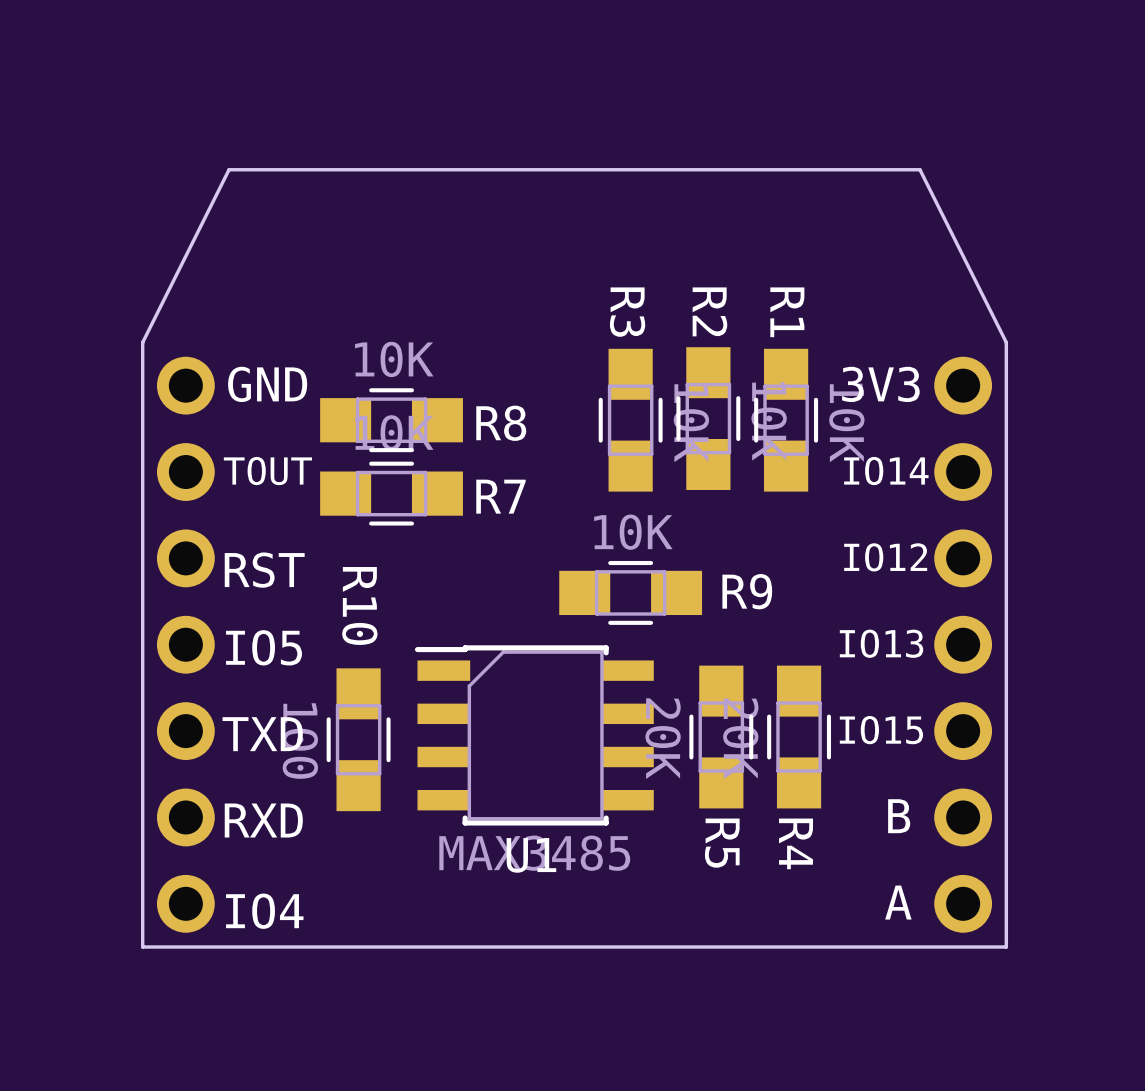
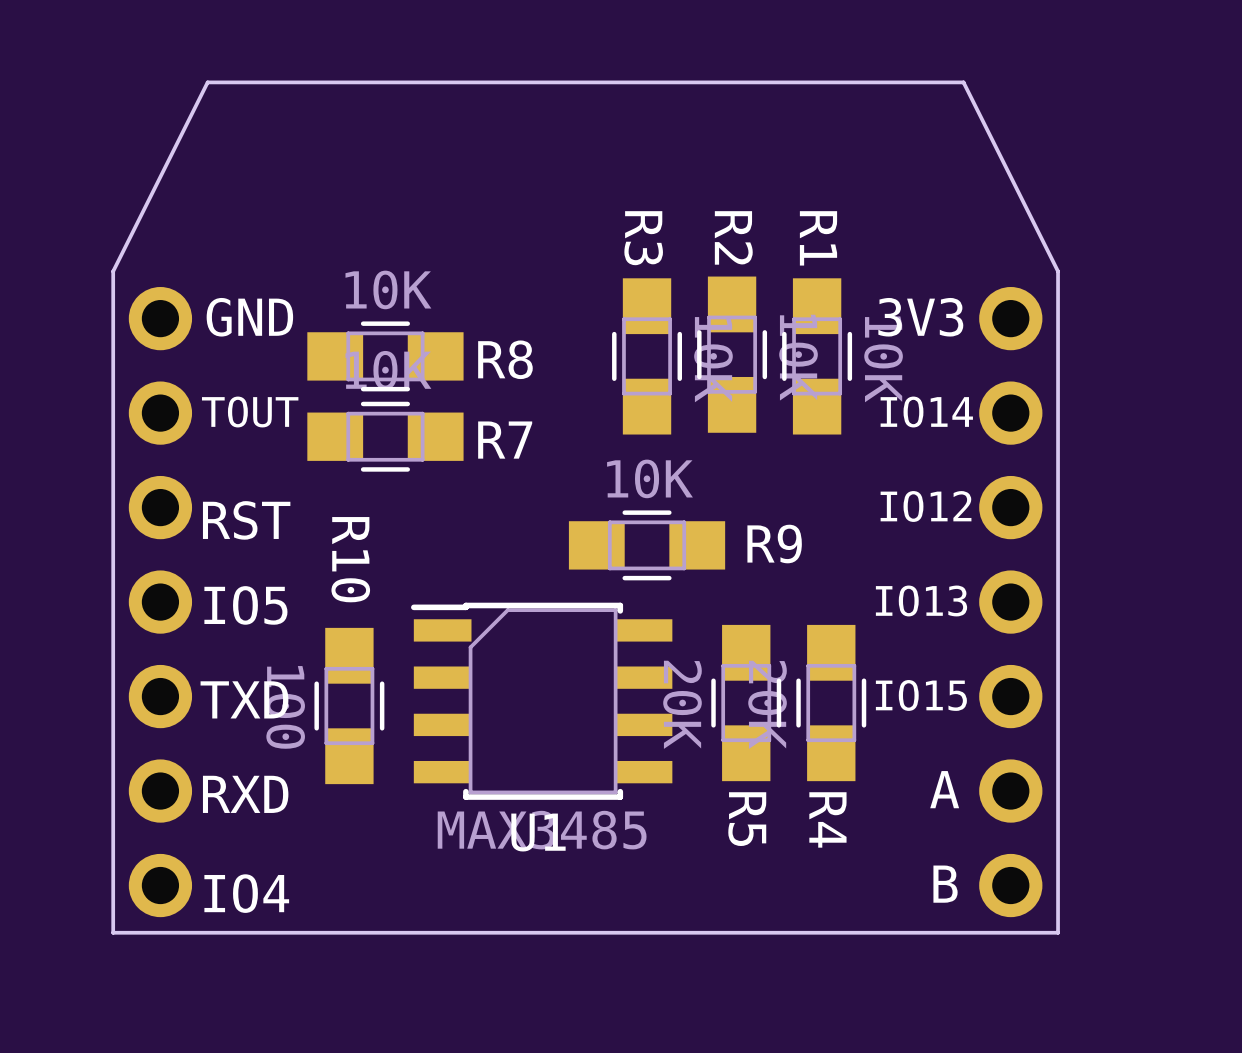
text: B (899, 816) -> A (944, 789)
text: A (898, 902) -> B (945, 884)

